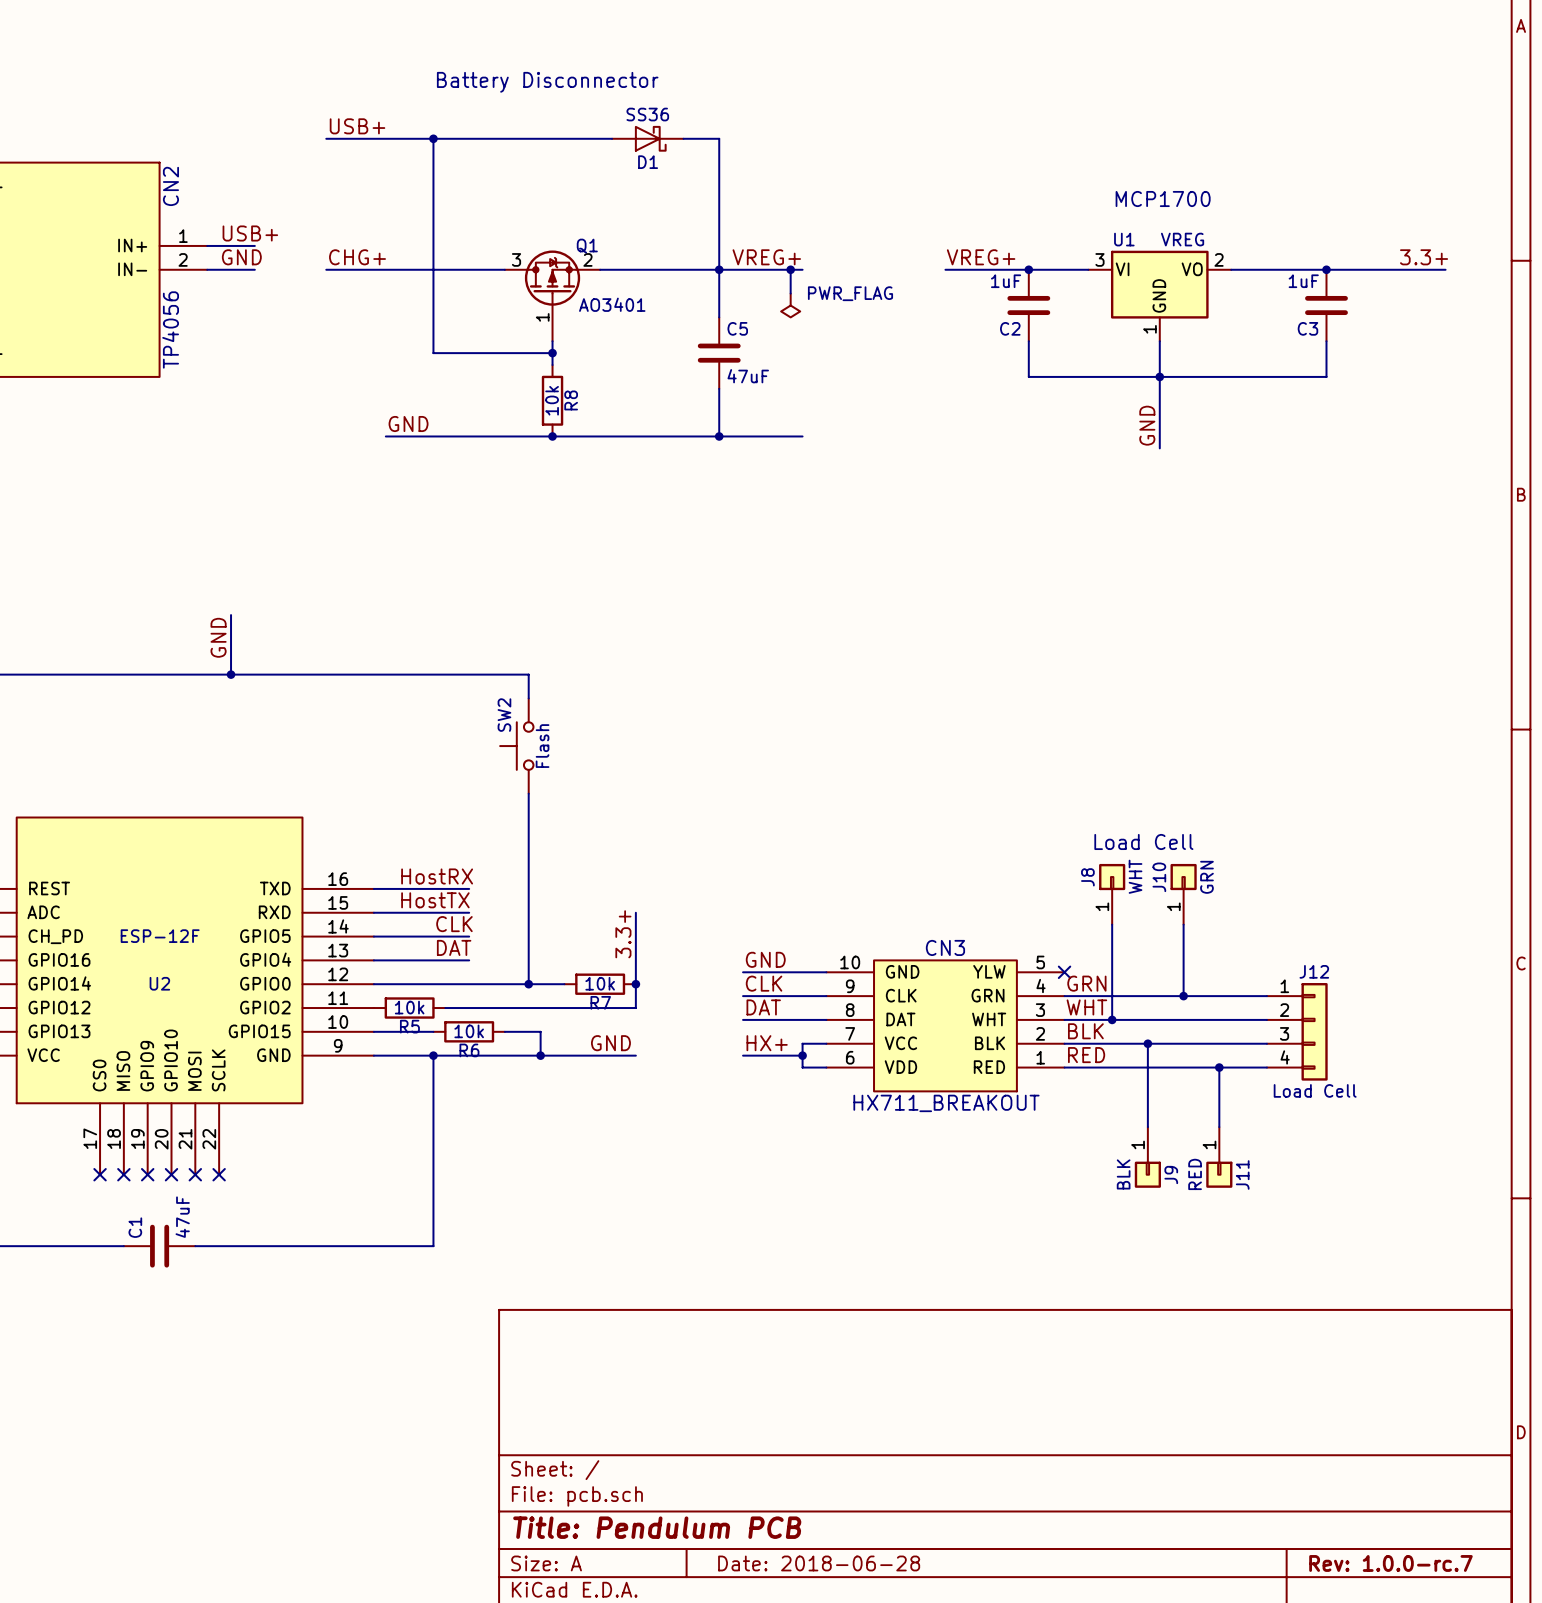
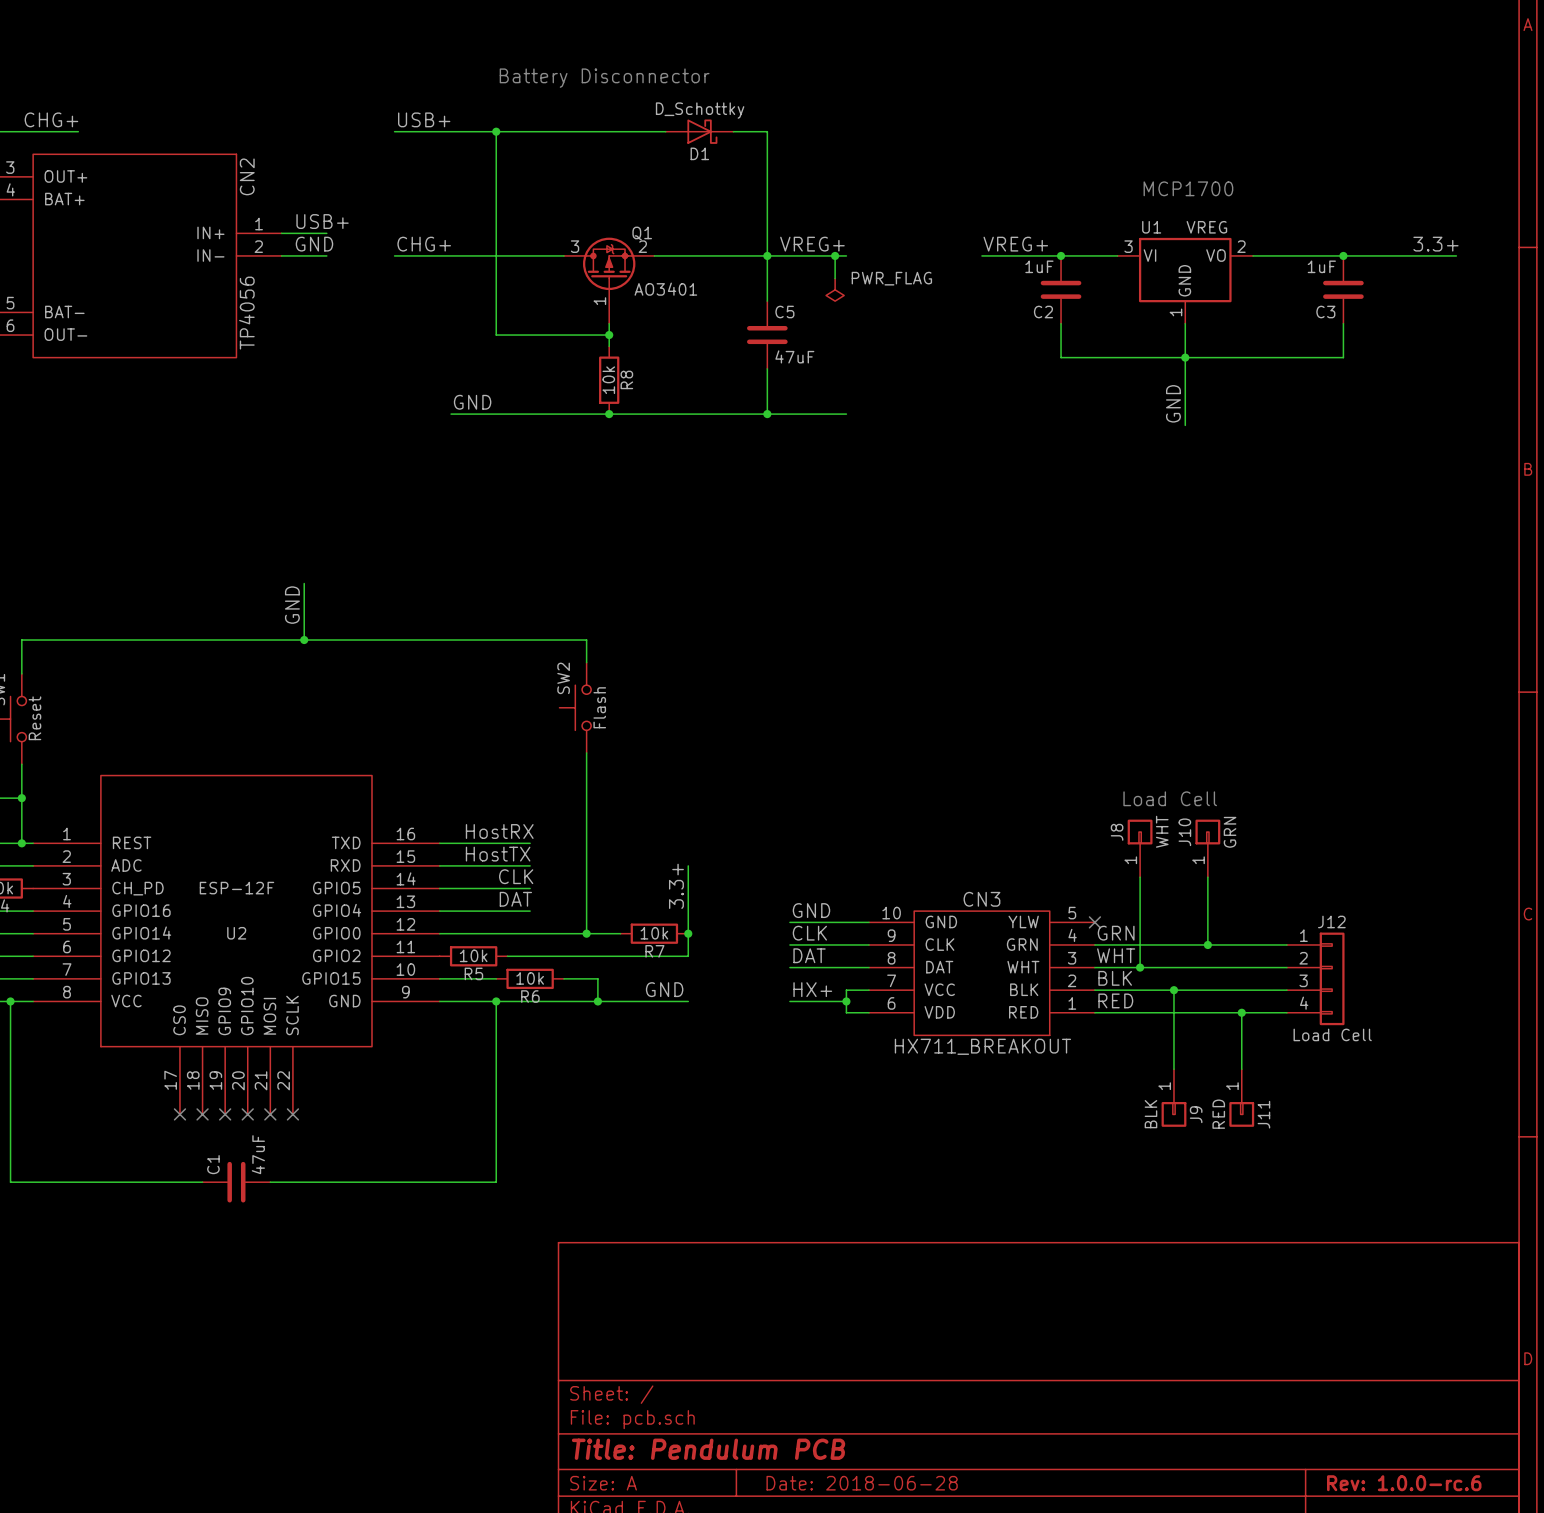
D1 value: SS36 (647, 114) -> D_Schottky (700, 110)
title block: Rev: 1.0.0-rc.7 (1390, 1563) -> Rev: 1.0.0-rc.6 (1404, 1483)

